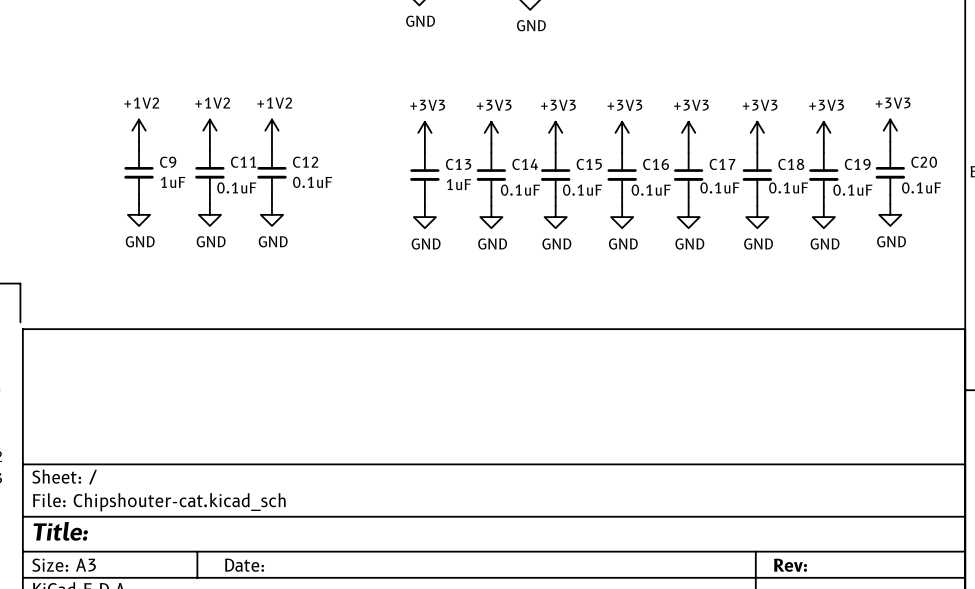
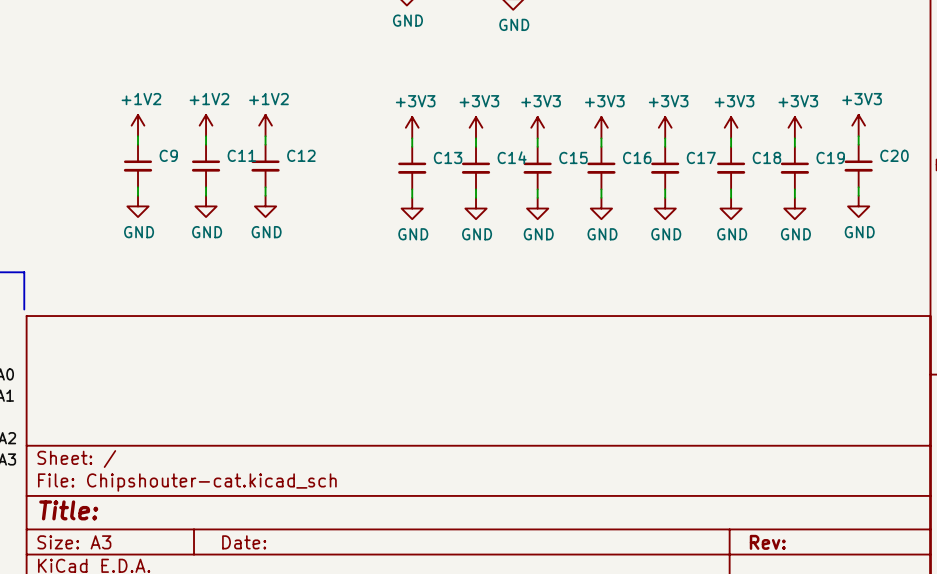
C9 value: 1uF (173, 182) -> none
C12 value: 0.1uF (312, 182) -> none
C13 value: 1uF (458, 184) -> none
C11 value: 0.1uF (236, 187) -> none
C17 value: 0.1uF (719, 187) -> none
C18 value: 0.1uF (788, 187) -> none
C20 value: 0.1uF (921, 187) -> none
C14 value: 0.1uF (520, 190) -> none
C15 value: 0.1uF (582, 190) -> none
C16 value: 0.1uF (651, 190) -> none
C19 value: 0.1uF (852, 190) -> none

